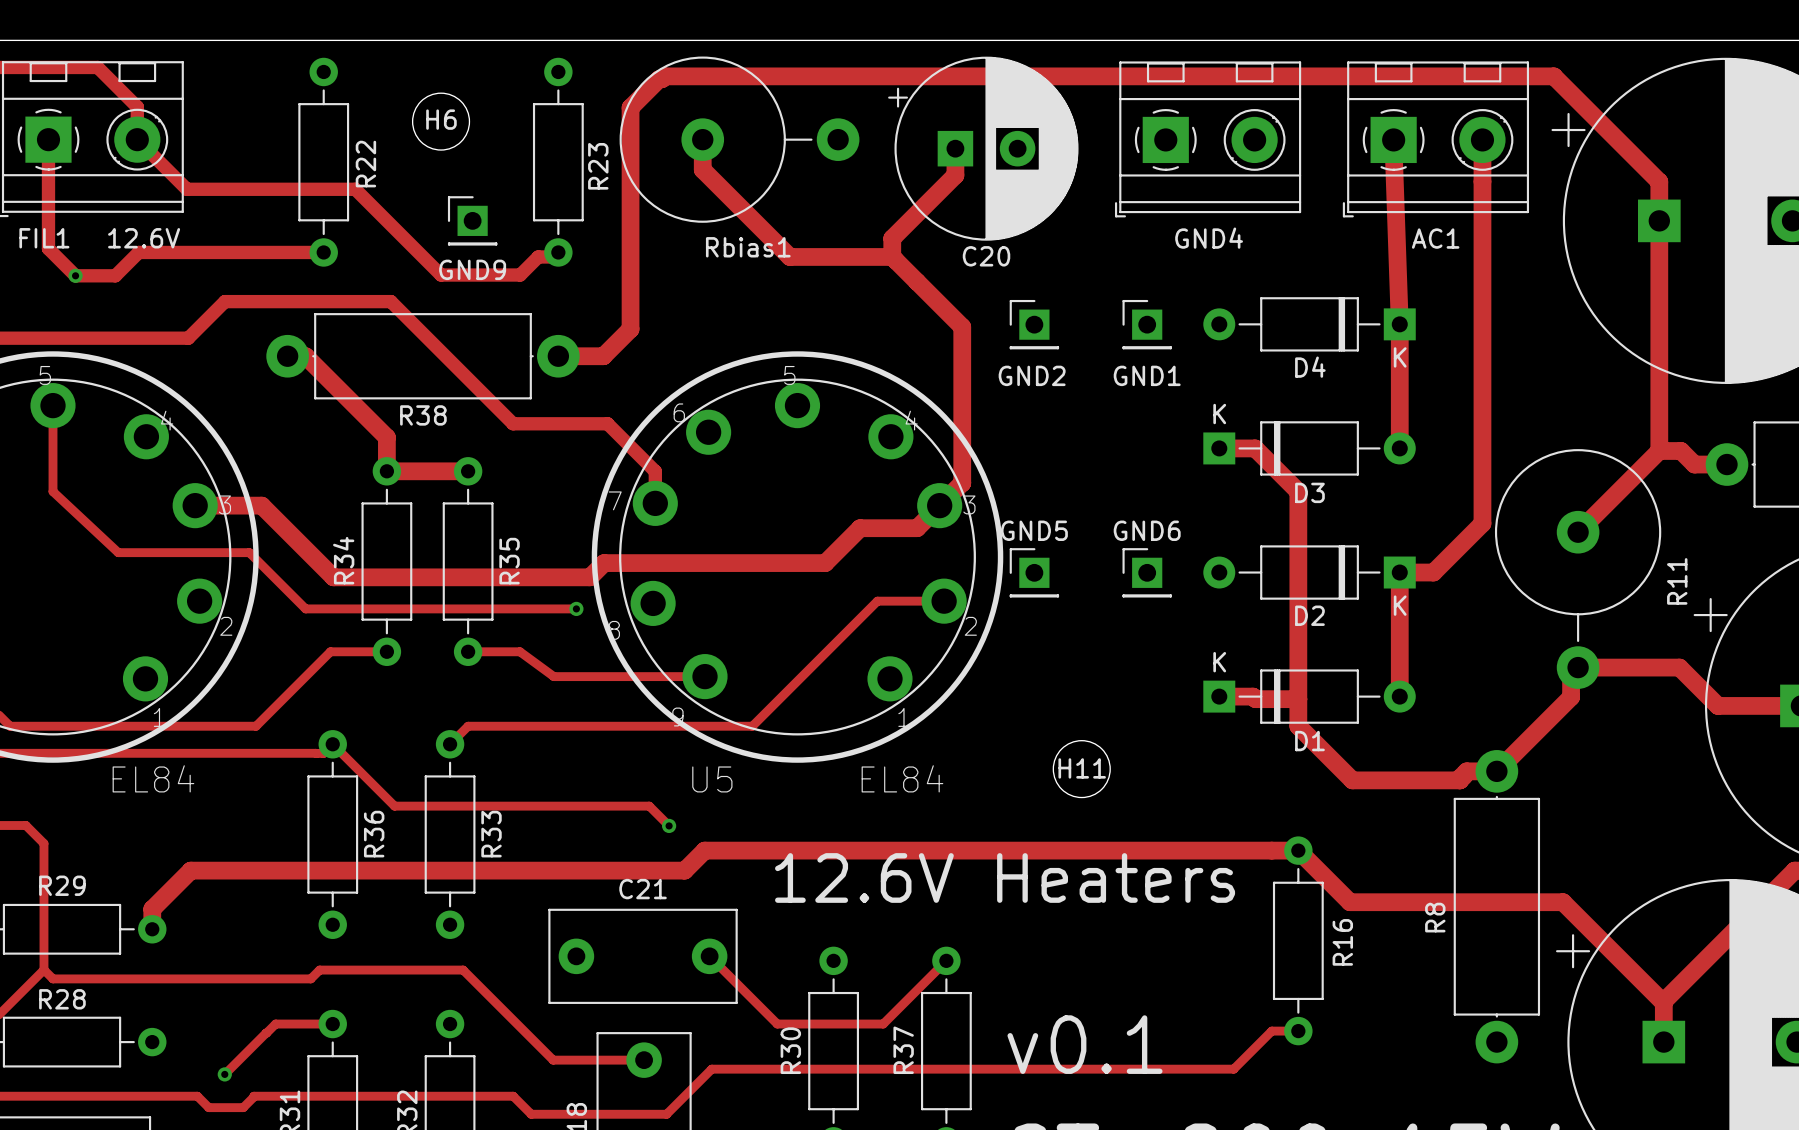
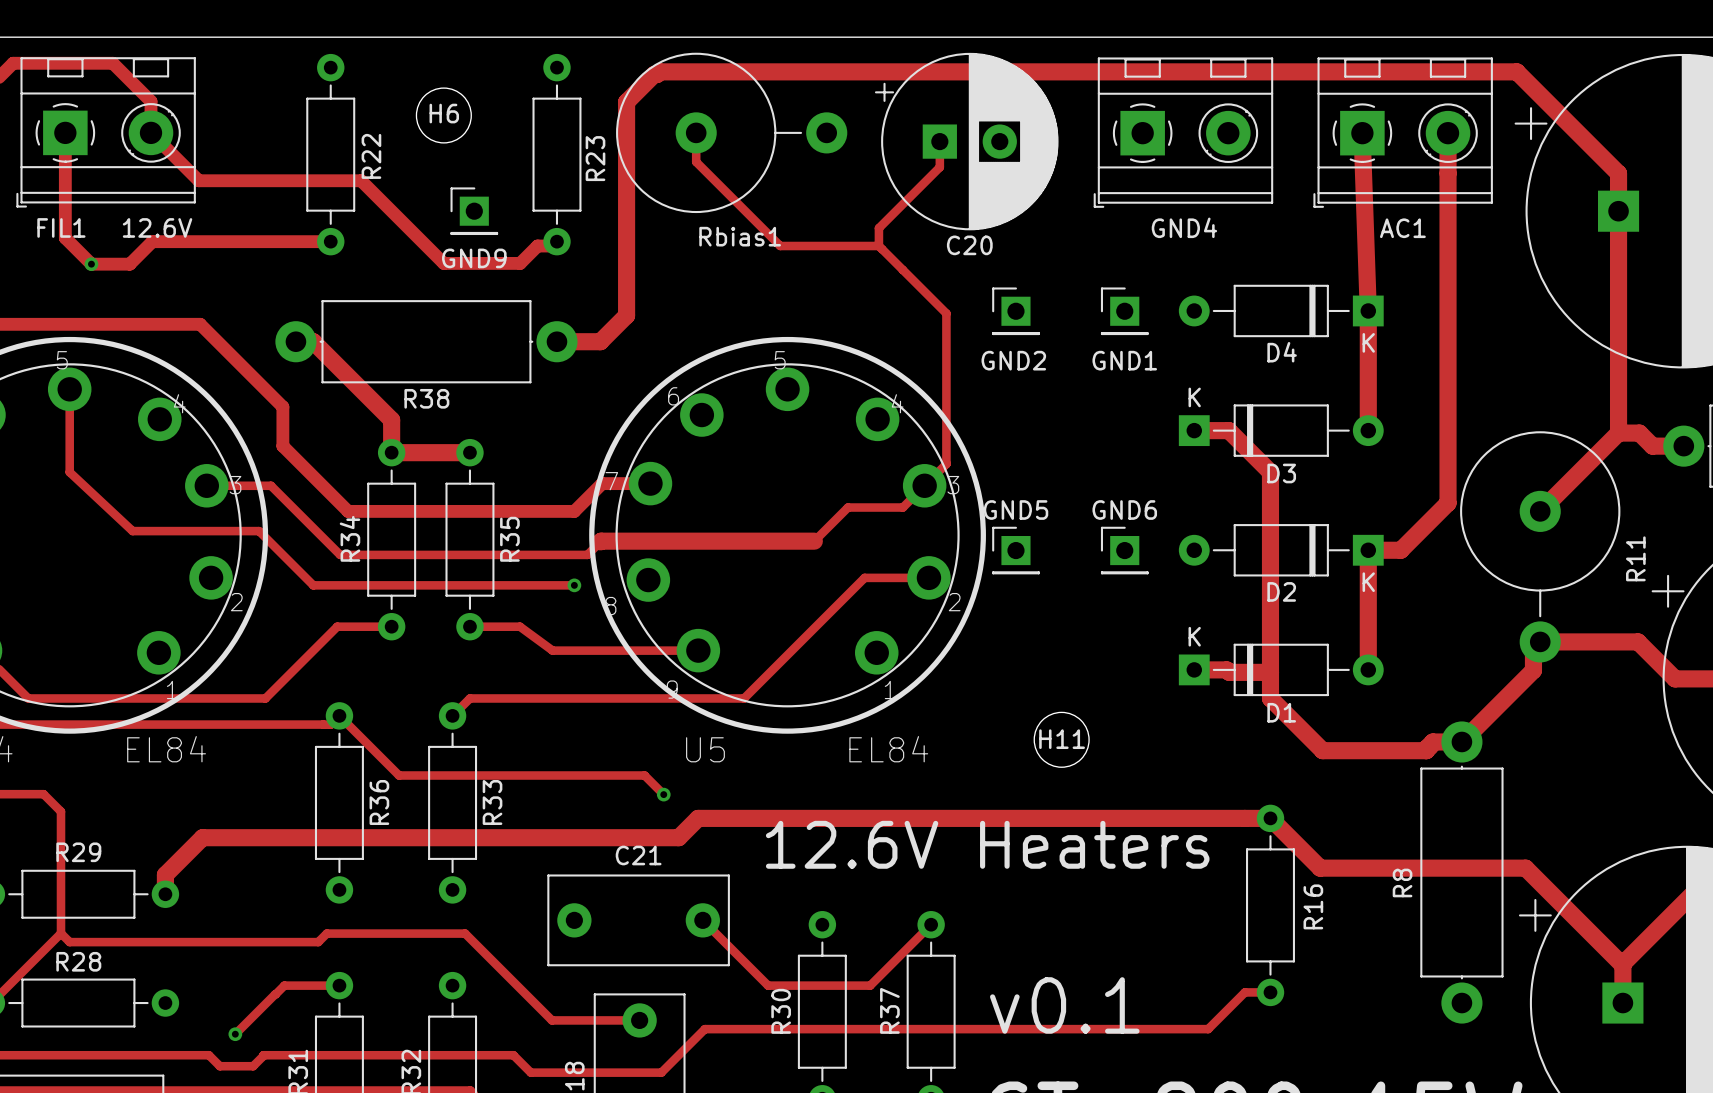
track width: thick (702, 139) (702, 169) (789, 256) (892, 256) -> thin (696, 132) (696, 161) (780, 246) (878, 246)
track width: thick (955, 148) (955, 175) (892, 238) (892, 256) -> thin (939, 141) (939, 167) (878, 228) (878, 246)
track width: thick (892, 256) (962, 326) (962, 483) (917, 528) (860, 528) (825, 563) -> thin (878, 246) (946, 313) (946, 464) (902, 507) (847, 507) (814, 541)
track: (188, 338) (224, 301) (390, 301) (513, 423) (607, 423) (655, 471) (655, 503) -> (200, 324) (282, 406) (282, 446) (348, 511) (574, 511) (602, 483) (650, 483)
track width: thick (195, 505) (261, 505) (333, 577) (589, 577) (603, 563) -> thin (206, 485) (271, 485) (340, 554) (587, 554) (600, 541)

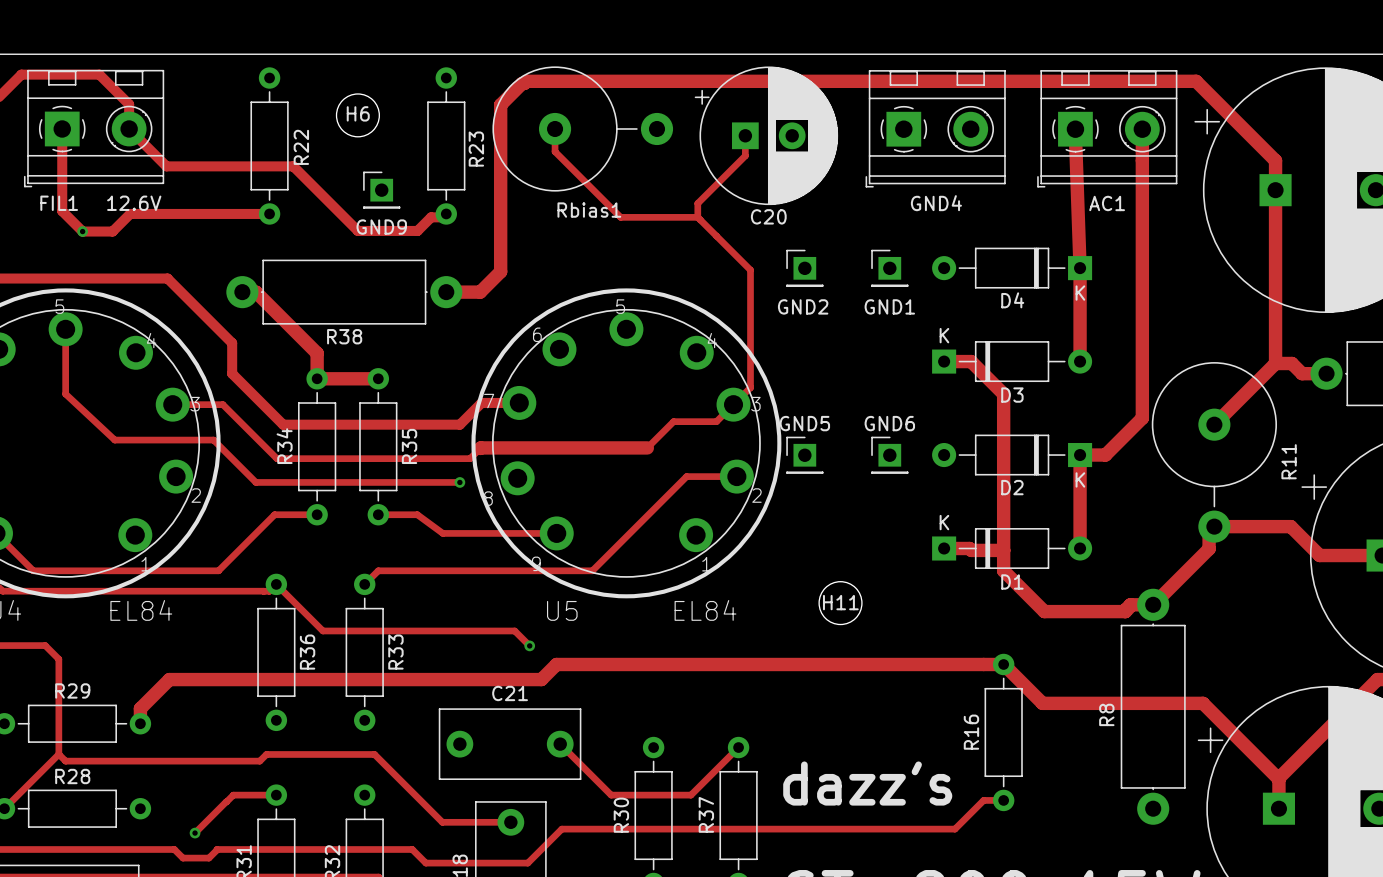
text: 12.6V Heaters (987, 844) -> none
R16 name position: R16 (1313, 906) -> R16 (971, 732)
text: none -> dazz's (867, 783)
text: v0.1 (1064, 1005) -> none

